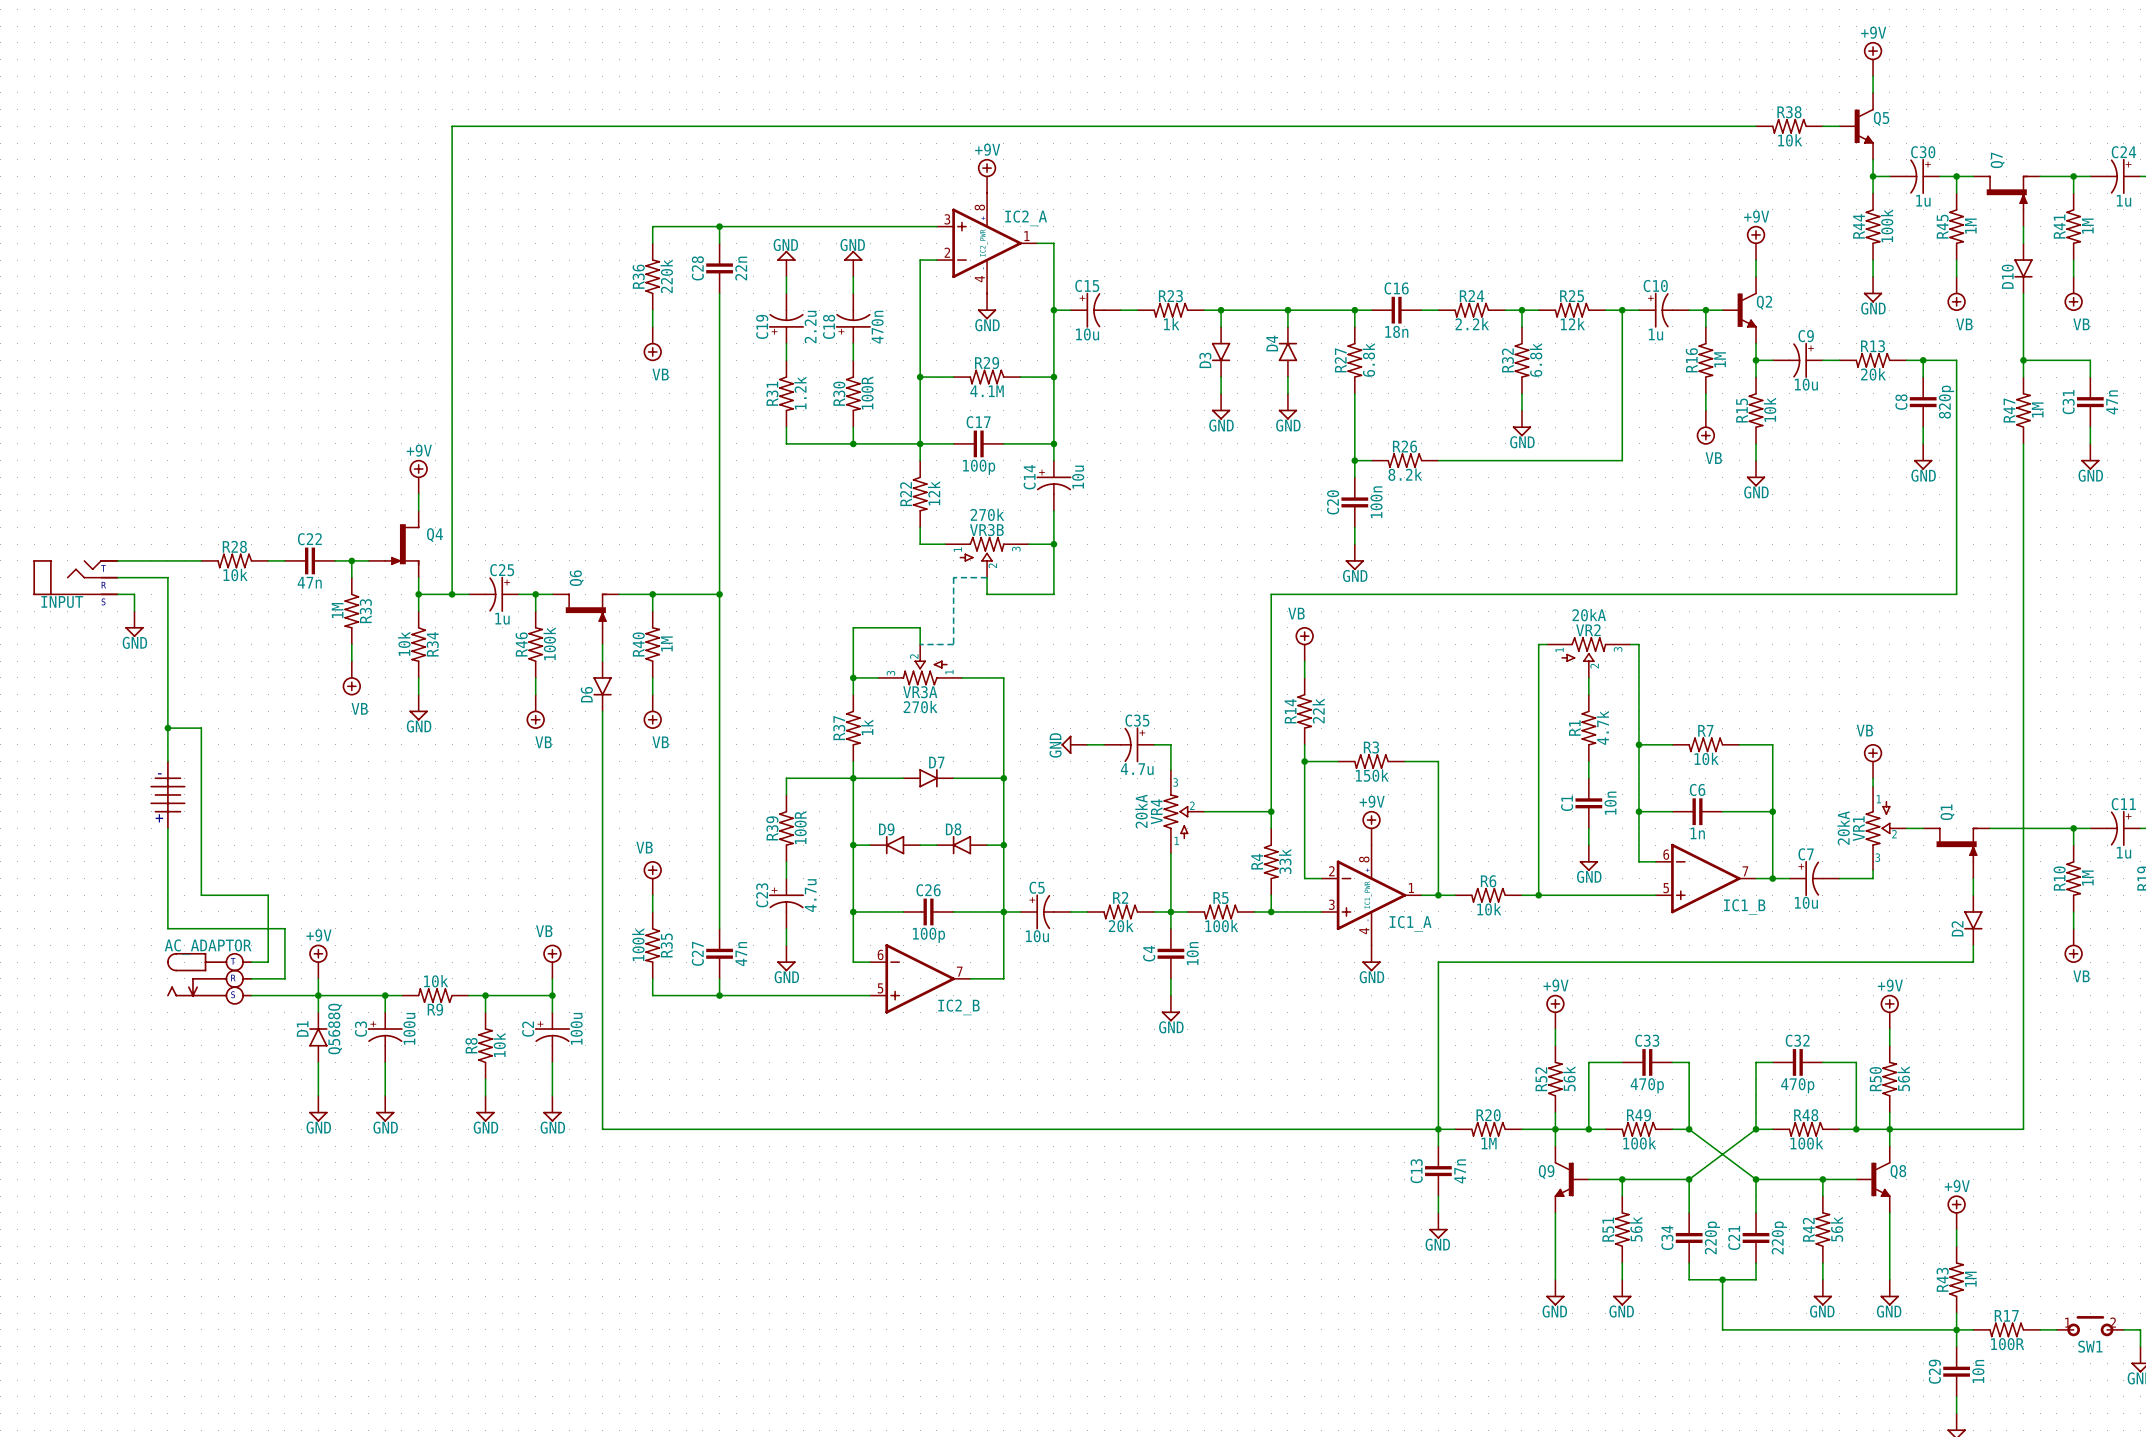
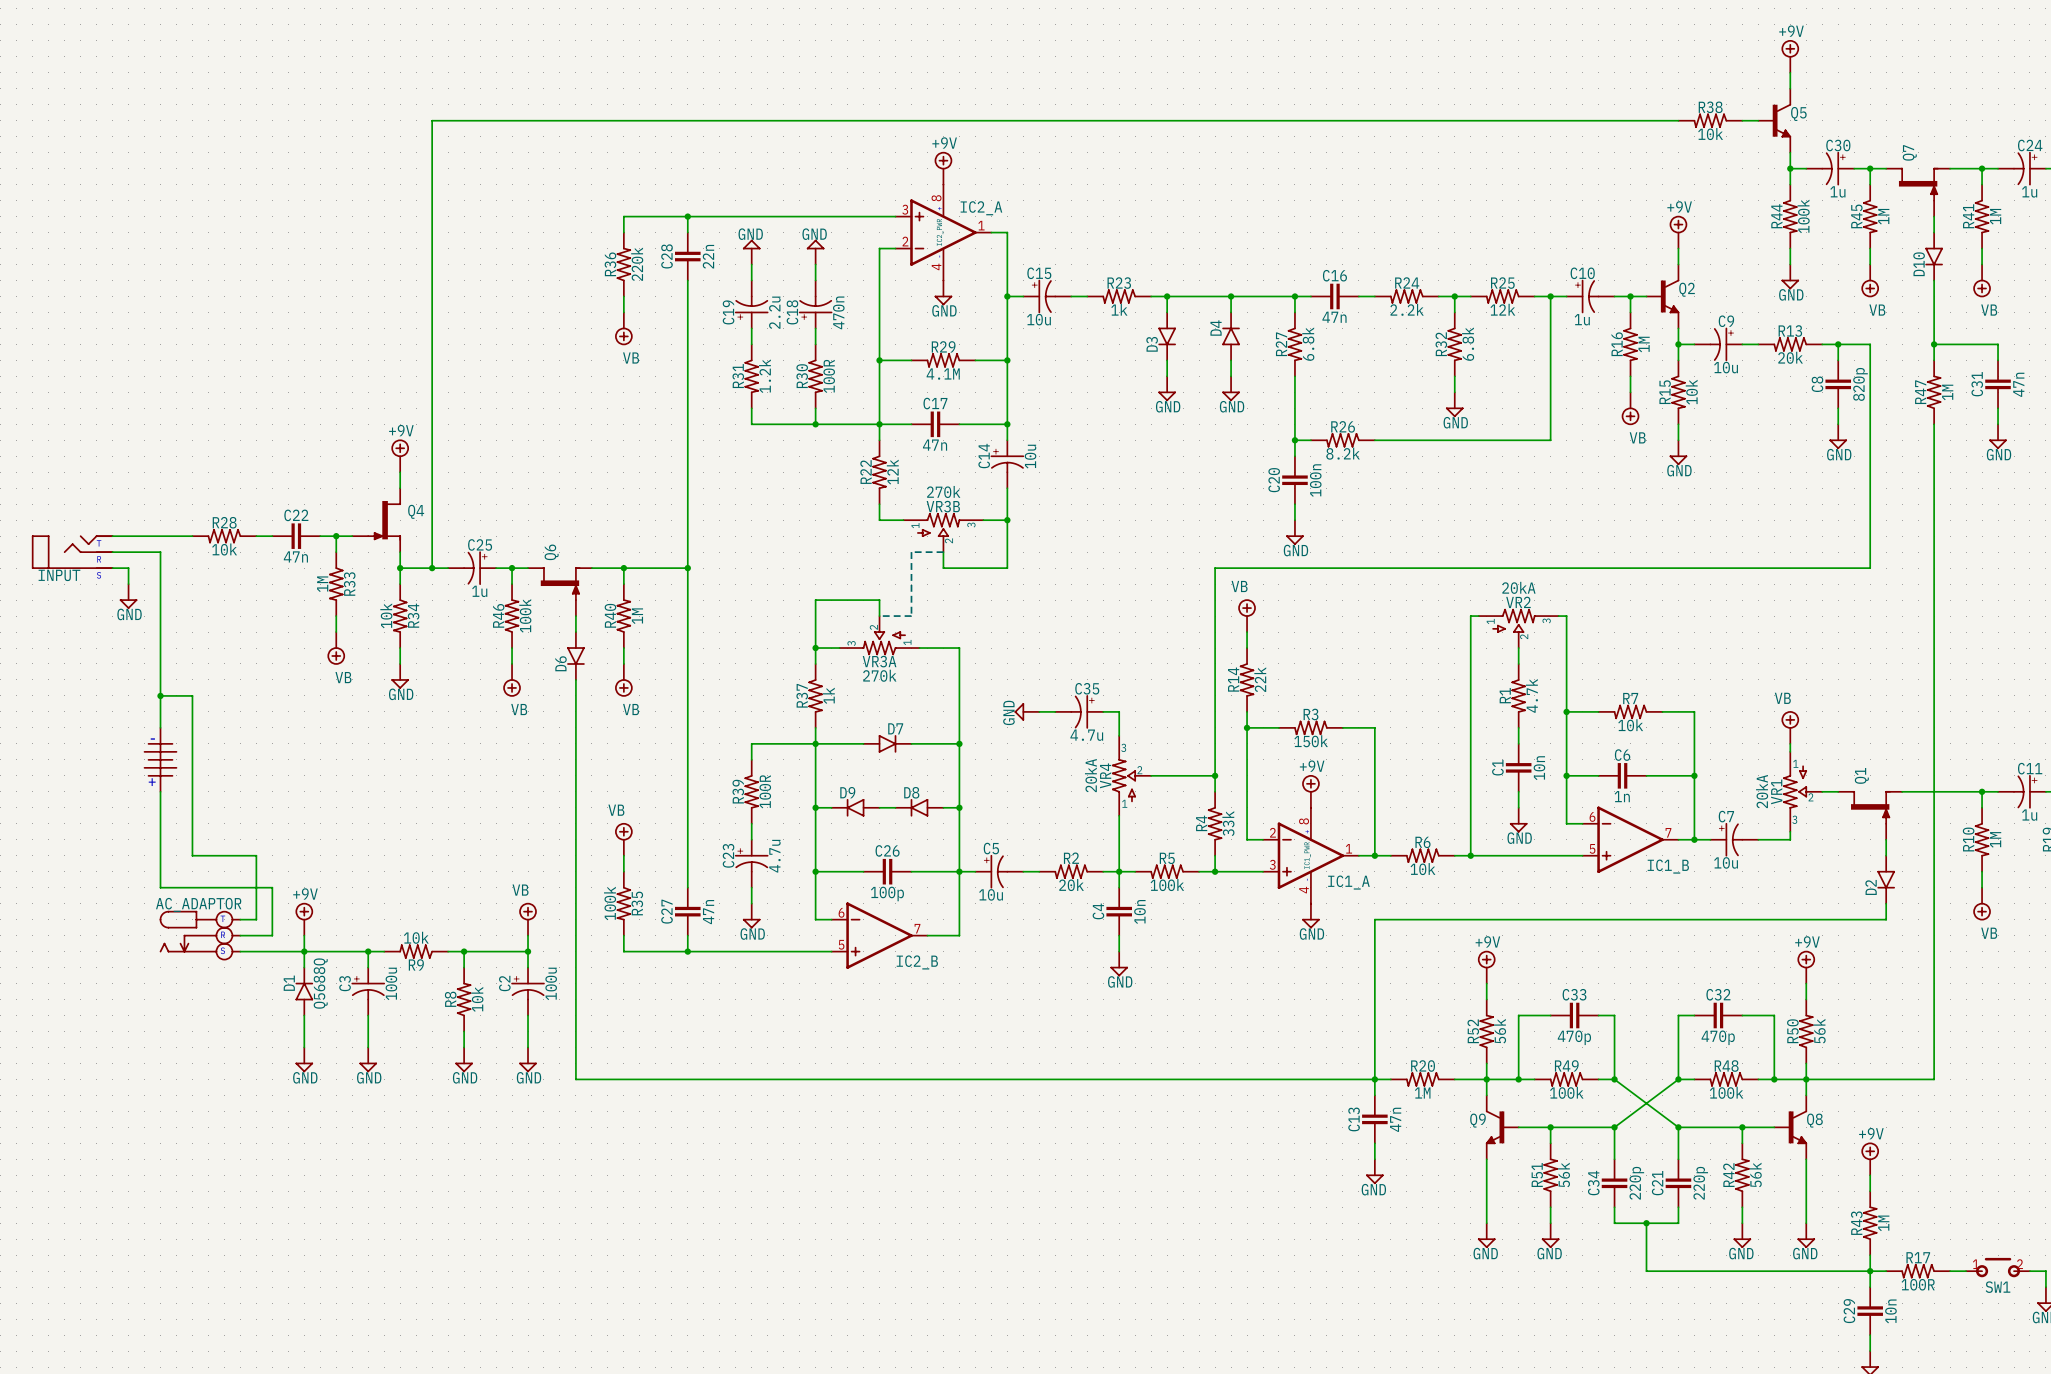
C16 value: 18n (1396, 331) -> 47n (1334, 317)
C17 value: 100p (979, 467) -> 47n (935, 445)

